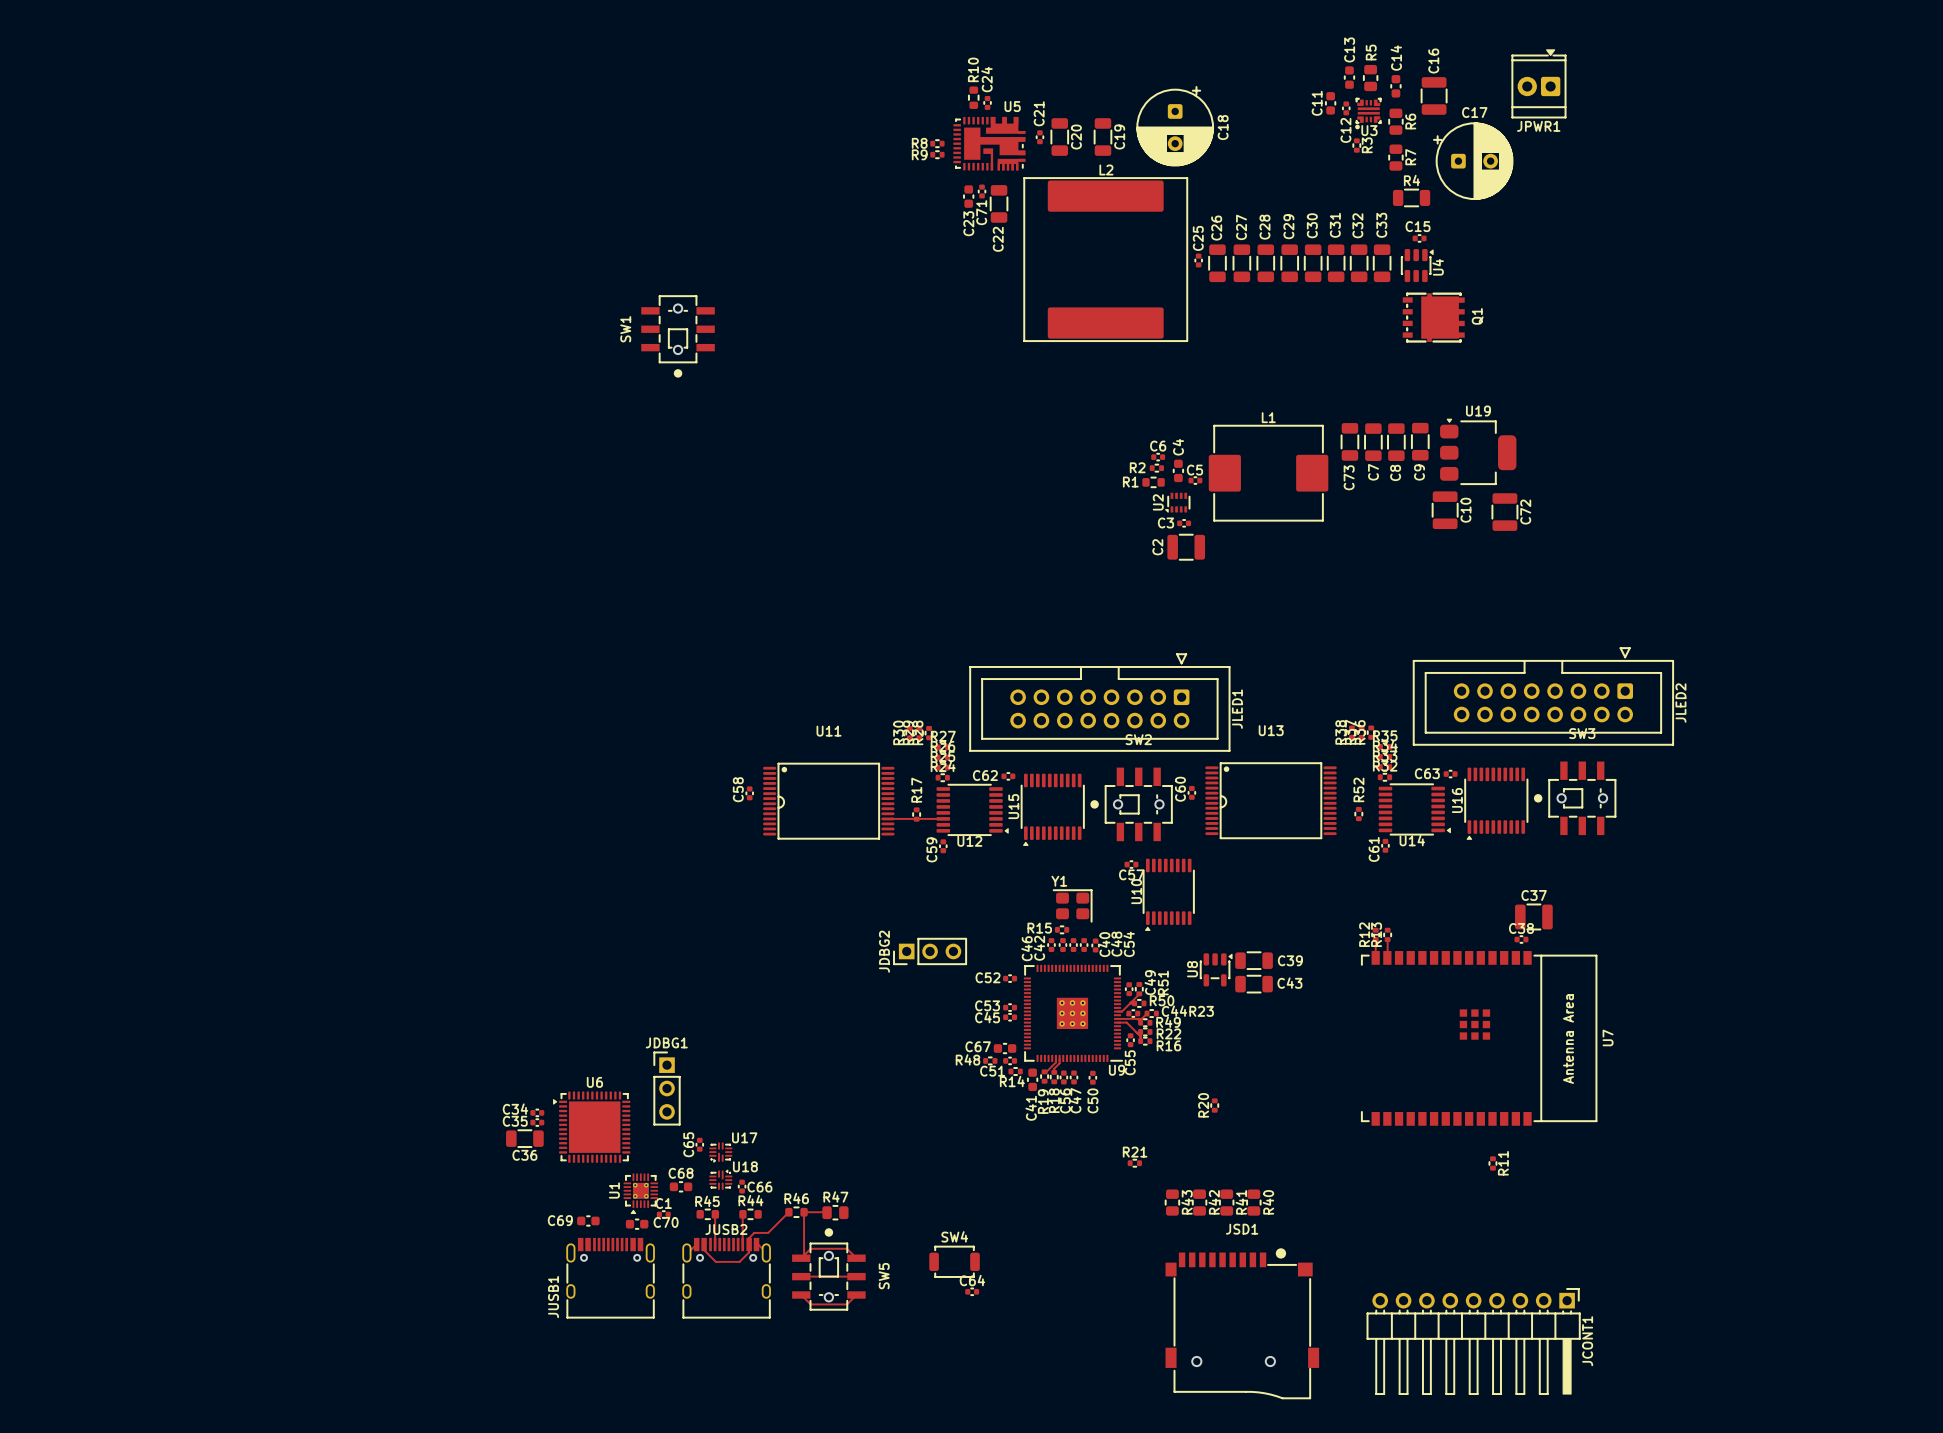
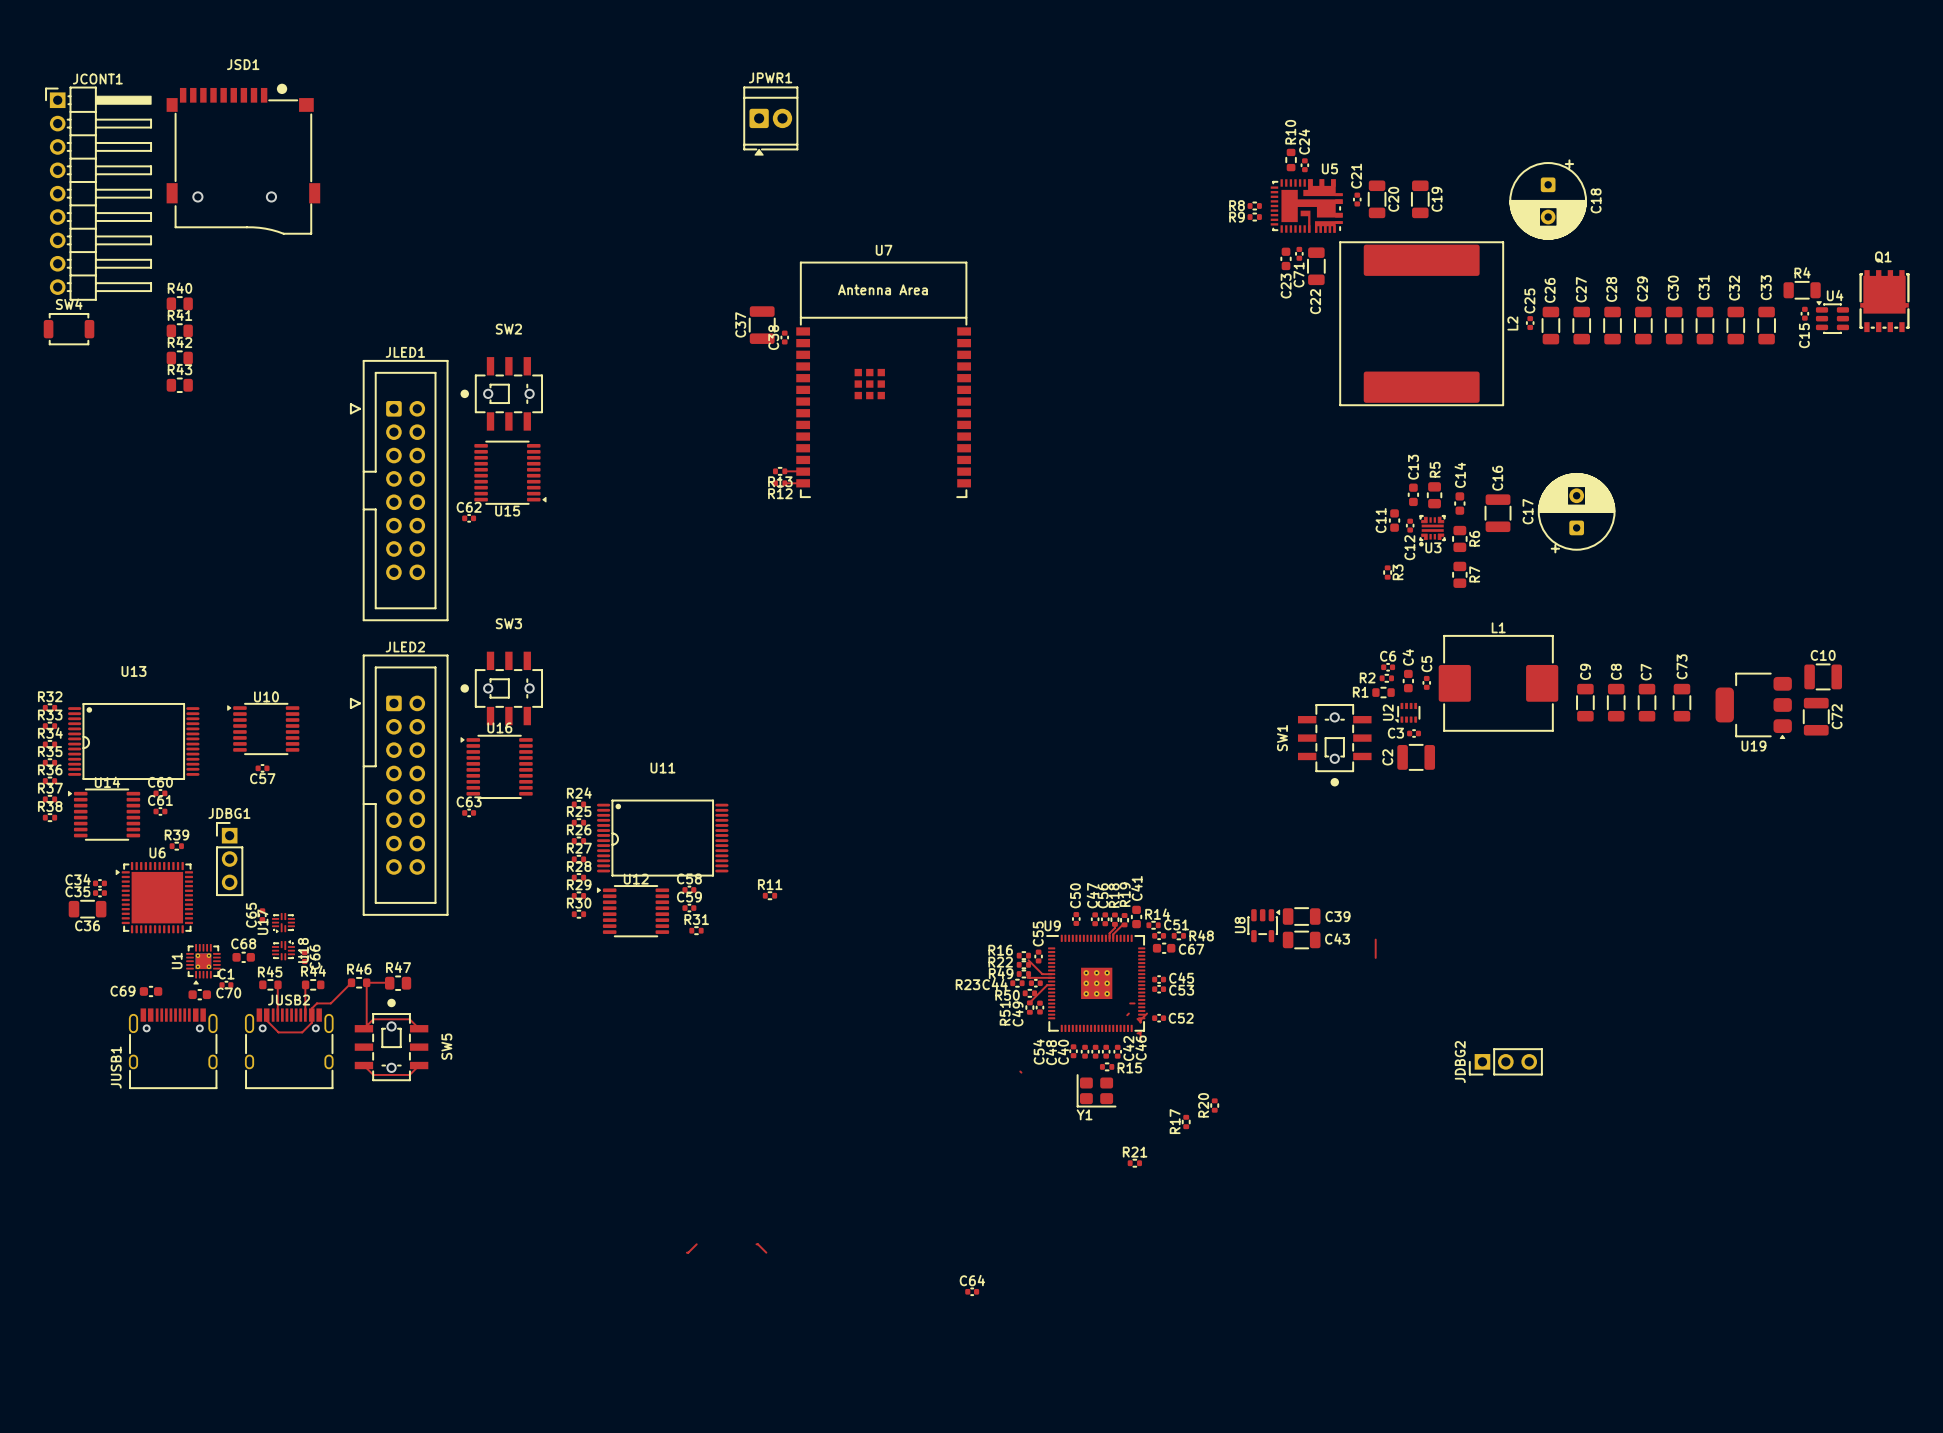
C13 position: (1349, 77) -> (1413, 494)
R5 position: (1370, 78) -> (1434, 495)
JPWR1 rotation: 0° (1538, 83) -> 180° (770, 121)
JPWR1 position: (1538, 83) -> (770, 121)
C14 position: (1395, 86) -> (1459, 503)
C16 position: (1434, 95) -> (1498, 513)
R10 position: (973, 97) -> (1291, 160)
C24 position: (987, 102) -> (1304, 165)
C11 position: (1330, 103) -> (1394, 520)
C12 position: (1346, 108) -> (1410, 525)
U3 position: (1368, 113) -> (1432, 530)
R6 position: (1395, 121) -> (1459, 538)
C18 position: (1175, 126) -> (1548, 199)
C21 position: (1039, 137) -> (1357, 199)
C20 position: (1059, 137) -> (1377, 199)
C19 position: (1102, 137) -> (1420, 199)
R8 position: (937, 143) -> (1254, 206)
U5 position: (989, 143) -> (1306, 206)
R3 position: (1356, 145) -> (1387, 572)
R9 position: (937, 154) -> (1254, 217)
R7 position: (1395, 157) -> (1459, 574)
C17 rotation: 0° (1473, 161) -> 90° counterclockwise (1576, 513)
C17 position: (1473, 161) -> (1576, 513)
L2 name rotation: 0° (1106, 170) -> 90° counterclockwise (1512, 323)
L2 name position: L2 (1106, 170) -> L2 (1512, 323)
C71 position: (982, 191) -> (1299, 253)
C23 position: (968, 196) -> (1286, 258)
R4 position: (1411, 197) -> (1802, 290)
C22 position: (999, 203) -> (1316, 266)
C15 name position: C15 (1418, 226) -> C15 (1804, 335)
C15 rotation: 0° (1419, 238) -> 90° clockwise (1804, 313)
C15 position: (1419, 238) -> (1804, 313)
L2 position: (1105, 259) -> (1421, 323)
C25 position: (1198, 260) -> (1530, 323)
C26 position: (1217, 263) -> (1550, 325)
C27 position: (1241, 263) -> (1581, 325)
C28 position: (1265, 263) -> (1612, 325)
C29 position: (1289, 263) -> (1643, 325)
C30 position: (1313, 263) -> (1674, 325)
C31 position: (1336, 263) -> (1704, 325)
C32 position: (1359, 263) -> (1735, 325)
C33 position: (1382, 263) -> (1766, 325)
U4 rotation: 0° (1417, 265) -> 90° counterclockwise (1832, 317)
U4 position: (1417, 265) -> (1832, 317)
Q1 rotation: 0° (1433, 314) -> 90° counterclockwise (1881, 301)
Q1 position: (1433, 314) -> (1881, 301)
SW1 position: (678, 336) -> (1334, 745)
C73 position: (1349, 441) -> (1681, 702)
C9 position: (1420, 441) -> (1585, 702)
C7 position: (1373, 442) -> (1647, 702)
C8 position: (1396, 442) -> (1616, 702)
U19 rotation: 0° (1478, 451) -> 180° (1753, 706)
U19 position: (1478, 451) -> (1753, 706)
C6 position: (1158, 457) -> (1388, 667)
R2 position: (1156, 468) -> (1386, 678)
C4 position: (1178, 470) -> (1408, 681)
top track: none -> (784, 471) (803, 471)
C7 name position: C7 (1373, 472) -> C7 (1646, 672)
C8 name position: C8 (1395, 472) -> C8 (1616, 671)
C9 name position: C9 (1419, 472) -> C9 (1585, 671)
L1 position: (1268, 473) -> (1498, 683)
C73 name position: C73 (1349, 477) -> C73 (1682, 666)
C5 rotation: 0° (1195, 480) -> 90° clockwise (1426, 682)
C5 position: (1195, 480) -> (1426, 682)
R1 position: (1153, 482) -> (1383, 692)
top track: none -> (784, 483) (803, 483)
U2 position: (1177, 502) -> (1407, 712)
C10 rotation: 0° (1445, 510) -> 90° clockwise (1823, 676)
C10 position: (1445, 510) -> (1823, 676)
C10 name position: C10 (1465, 510) -> C10 (1823, 655)
C72 position: (1504, 512) -> (1816, 716)
C3 position: (1184, 523) -> (1414, 733)
C2 position: (1186, 547) -> (1416, 757)
JLED2 rotation: 0° (1543, 696) -> 90° counterclockwise (399, 785)
JLED2 position: (1543, 696) -> (399, 785)
JLED1 rotation: 0° (1099, 702) -> 90° counterclockwise (399, 490)
JLED1 position: (1099, 702) -> (399, 490)
R38 rotation: 0° (1351, 732) -> 90° clockwise (49, 817)
R38 position: (1351, 732) -> (49, 817)
R37 rotation: 0° (1361, 732) -> 90° clockwise (49, 799)
R37 position: (1361, 732) -> (49, 799)
R36 rotation: 0° (1371, 732) -> 90° clockwise (49, 781)
R36 position: (1371, 732) -> (49, 781)
R30 rotation: 0° (909, 733) -> 90° clockwise (578, 914)
R30 position: (909, 733) -> (578, 914)
R29 rotation: 0° (919, 733) -> 90° clockwise (578, 895)
R29 position: (919, 733) -> (578, 895)
R28 rotation: 0° (929, 733) -> 90° clockwise (578, 877)
R28 position: (929, 733) -> (578, 877)
R35 position: (1385, 746) -> (49, 762)
R27 position: (942, 747) -> (578, 859)
R26 position: (942, 757) -> (578, 841)
R34 position: (1384, 757) -> (49, 744)
R25 position: (942, 767) -> (578, 822)
R33 position: (1384, 767) -> (49, 726)
C63 name position: C63 (1427, 773) -> C63 (469, 801)
C63 position: (1450, 774) -> (469, 812)
C62 name position: C62 (985, 775) -> C62 (469, 507)
C62 position: (1008, 776) -> (469, 518)
R24 position: (942, 777) -> (578, 804)
R32 position: (1384, 777) -> (49, 707)
R17 name position: R17 (916, 790) -> R17 (1175, 1121)
C60 rotation: 0° (1191, 792) -> 90° clockwise (160, 793)
C60 position: (1191, 792) -> (160, 793)
C58 rotation: 0° (749, 793) -> 90° clockwise (689, 889)
C58 position: (749, 793) -> (689, 889)
SW3 position: (1574, 798) -> (501, 688)
U13 position: (1270, 800) -> (133, 741)
U11 position: (828, 801) -> (662, 838)
U16 rotation: 0° (1496, 803) -> 90° clockwise (496, 766)
U16 position: (1496, 803) -> (496, 766)
SW2 position: (1131, 804) -> (501, 393)
U12 rotation: 0° (972, 809) -> 180° (633, 911)
U12 position: (972, 809) -> (633, 911)
U15 rotation: 0° (1052, 809) -> 90° counterclockwise (510, 472)
U15 position: (1052, 809) -> (510, 472)
U14 rotation: 0° (1414, 809) -> 180° (104, 814)
U14 position: (1414, 809) -> (104, 814)
R17 position: (916, 814) -> (1186, 1121)
R52: (1358, 814) -> none
top track: (887, 818) (943, 818) -> none
C61 rotation: 0° (1385, 845) -> 90° clockwise (160, 811)
C61 position: (1385, 845) -> (160, 811)
R39: none -> (176, 846)
C59 rotation: 0° (943, 846) -> 90° clockwise (689, 908)
C59 position: (943, 846) -> (689, 908)
C57 position: (1131, 864) -> (262, 768)
Y1 name position: Y1 (1059, 881) -> Y1 (1084, 1114)
U10 rotation: 0° (1168, 894) -> 90° clockwise (263, 728)
U10 position: (1168, 894) -> (263, 728)
C37 name position: C37 (1534, 895) -> C37 (740, 324)
Y1 rotation: 0° (1072, 905) -> 180° (1096, 1090)
Y1 position: (1072, 905) -> (1096, 1090)
C37 rotation: 0° (1533, 916) -> 90° clockwise (762, 325)
C37 position: (1533, 916) -> (762, 325)
top track: none -> (1114, 924) (1114, 928) (1109, 933) (1109, 938)
top track: none -> (1124, 924) (1113, 934) (1113, 938)
R15 name position: R15 (1039, 928) -> R15 (1129, 1067)
R15 position: (1062, 929) -> (1107, 1066)
R31: none -> (696, 930)
R12 rotation: 0° (1375, 934) -> 90° clockwise (780, 483)
R12 position: (1375, 934) -> (780, 483)
R13 rotation: 0° (1387, 934) -> 90° clockwise (780, 471)
R13 position: (1387, 934) -> (780, 471)
top track: (1387, 939) (1387, 957) -> none
C38 rotation: 0° (1521, 939) -> 90° clockwise (784, 337)
C38 position: (1521, 939) -> (784, 337)
C40 name position: C40 (1104, 944) -> C40 (1063, 1052)
C48 name position: C48 (1116, 944) -> C48 (1051, 1052)
C54 name position: C54 (1129, 944) -> C54 (1038, 1051)
C46 position: (1051, 945) -> (1117, 1051)
C42 position: (1062, 945) -> (1106, 1051)
C40 position: (1073, 945) -> (1095, 1051)
C48 position: (1084, 945) -> (1085, 1051)
C54 position: (1095, 945) -> (1073, 1051)
C46 name position: C46 (1026, 948) -> C46 (1141, 1048)
C42 name position: C42 (1039, 948) -> C42 (1128, 1048)
JDBG2 position: (930, 951) -> (1505, 1061)
top track: none -> (1028, 960) (1042, 974) (1051, 974)
C39 position: (1254, 960) -> (1301, 916)
U8 position: (1216, 969) -> (1263, 925)
C52 name position: C52 (988, 977) -> C52 (1181, 1018)
C52 position: (1010, 978) -> (1159, 1018)
top track: none -> (351, 982) (330, 1003) (316, 1003) (311, 1008) (311, 1022) (302, 1032) (278, 1032) (266, 1020) (266, 1014)
C49 name position: C49 (1150, 982) -> C49 (1017, 1014)
R51 name position: R51 (1163, 982) -> R51 (1005, 1013)
top track: none -> (389, 983) (366, 982) (366, 1025)
top track: none -> (277, 984) (277, 1014)
top track: none -> (305, 984) (305, 1014)
C43 position: (1254, 984) -> (1301, 939)
top track: none -> (1051, 985) (1047, 985) (1030, 1002)
C49 position: (1129, 989) -> (1039, 1007)
R51 position: (1139, 989) -> (1029, 1007)
top track: (1138, 993) (1121, 1011) (1117, 1011) -> none
R50 name position: R50 (1162, 1000) -> R50 (1007, 995)
R50 position: (1139, 1003) -> (1029, 993)
C53 name position: C53 (987, 1005) -> C53 (1181, 990)
C53 position: (1010, 1007) -> (1159, 989)
C44 name position: C44 (1174, 1011) -> C44 (995, 984)
R23 name position: R23 (1201, 1011) -> R23 (967, 984)
U9 rotation: 0° (1073, 1013) -> 180° (1095, 983)
C44 position: (1133, 1013) -> (1035, 983)
R23 position: (1151, 1013) -> (1017, 983)
C45 name position: C45 (987, 1017) -> C45 (1181, 978)
C45 position: (1010, 1017) -> (1159, 979)
top track: (1117, 1018) (1141, 1018) -> (1027, 977) (1051, 977)
top track: (1117, 1022) (1126, 1022) (1140, 1036) -> none
R49 position: (1145, 1022) -> (1023, 974)
R49 name position: R49 (1168, 1022) -> R49 (1001, 973)
top track: none -> (363, 1028) (373, 1019) (409, 1019) (419, 1028)
R22 position: (1145, 1031) -> (1023, 964)
R22 name position: R22 (1168, 1033) -> R22 (1000, 962)
U7 rotation: 0° (1479, 1038) -> 90° counterclockwise (883, 379)
U7 position: (1479, 1038) -> (883, 379)
C55 position: (1130, 1040) -> (1038, 956)
R16 position: (1145, 1041) -> (1023, 955)
R16 name position: R16 (1168, 1045) -> R16 (1000, 950)
C67 name position: C67 (978, 1046) -> C67 (1191, 949)
C67 position: (1005, 1048) -> (1164, 948)
top track: (1055, 1058) (1055, 1062) (1044, 1071) -> none
top track: (1059, 1058) (1059, 1063) (1054, 1068) (1054, 1072) -> none
R48 name position: R48 (967, 1059) -> R48 (1201, 935)
R48 position: (990, 1060) -> (1178, 935)
C51 position: (1010, 1060) -> (1159, 935)
C55 name position: C55 (1130, 1062) -> C55 (1038, 933)
top track: none -> (363, 1065) (373, 1074) (409, 1074) (419, 1065)
C51 name position: C51 (992, 1071) -> C51 (1176, 924)
R14 position: (1015, 1071) -> (1153, 925)
R19 position: (1044, 1076) -> (1124, 920)
R18 position: (1054, 1077) -> (1114, 919)
C56 position: (1063, 1077) -> (1105, 919)
C47 position: (1074, 1077) -> (1095, 919)
C50 position: (1092, 1077) -> (1076, 919)
C41 position: (1032, 1079) -> (1136, 916)
R14 name position: R14 (1012, 1081) -> R14 (1157, 914)
JDBG1 position: (667, 1088) -> (229, 859)
R18 name position: R18 (1054, 1100) -> R18 (1114, 895)
C56 name position: C56 (1065, 1100) -> C56 (1103, 895)
C47 name position: C47 (1075, 1100) -> C47 (1092, 895)
C50 name position: C50 (1092, 1100) -> C50 (1075, 895)
R19 name position: R19 (1043, 1101) -> R19 (1125, 894)
C41 name position: C41 (1031, 1108) -> C41 (1136, 888)
C34 position: (537, 1112) -> (99, 883)
C35 position: (537, 1122) -> (99, 893)
U6 position: (591, 1127) -> (154, 897)
U17 name rotation: 0° (744, 1137) -> 90° counterclockwise (262, 922)
U17 name position: U17 (744, 1137) -> U17 (262, 922)
C36 position: (524, 1138) -> (87, 909)
C65 position: (699, 1144) -> (262, 915)
U17 position: (720, 1152) -> (283, 923)
R11 rotation: 0° (1492, 1163) -> 90° clockwise (769, 895)
R11 position: (1492, 1163) -> (769, 895)
U18 name rotation: 0° (745, 1166) -> 90° counterclockwise (303, 950)
U18 position: (720, 1179) -> (283, 950)
C68 position: (681, 1186) -> (243, 957)
C66 position: (742, 1186) -> (304, 957)
C66 name rotation: 0° (759, 1187) -> 90° counterclockwise (315, 957)
U1 position: (640, 1193) -> (203, 964)
R43 rotation: 0° (1172, 1202) -> 90° clockwise (179, 385)
R43 position: (1172, 1202) -> (179, 385)
R43 name position: R43 (1187, 1202) -> R43 (179, 369)
R42 rotation: 0° (1199, 1202) -> 90° clockwise (179, 358)
R42 position: (1199, 1202) -> (179, 358)
R42 name position: R42 (1214, 1202) -> R42 (179, 342)
R41 rotation: 0° (1226, 1202) -> 90° clockwise (179, 330)
R41 position: (1226, 1202) -> (179, 330)
R41 name position: R41 (1241, 1202) -> R41 (179, 315)
R40 rotation: 0° (1253, 1202) -> 90° clockwise (179, 303)
R40 position: (1253, 1202) -> (179, 303)
R40 name position: R40 (1268, 1202) -> R40 (179, 288)
top track: (788, 1212) (768, 1232) (754, 1232) (749, 1238) (749, 1252) (739, 1261) (715, 1261) (704, 1250) (704, 1244) -> none
R46 position: (796, 1212) -> (359, 982)
top track: (827, 1212) (804, 1212) (804, 1255) -> none
R47 position: (835, 1212) -> (398, 983)
C1 position: (663, 1214) -> (226, 985)
R45 position: (707, 1214) -> (270, 984)
top track: (715, 1214) (715, 1244) -> none
top track: (742, 1214) (742, 1244) -> none
R44 position: (750, 1214) -> (313, 984)
C69 position: (588, 1220) -> (151, 991)
C70 position: (637, 1224) -> (199, 994)
top track: (801, 1258) (810, 1248) (847, 1248) (856, 1258) -> none
SW4 position: (954, 1261) -> (69, 329)
SW5 position: (828, 1269) -> (391, 1039)
top track: (801, 1276) (856, 1276) -> none
JUSB1 position: (610, 1278) -> (173, 1048)
JUSB2 position: (726, 1278) -> (289, 1048)
top track: (801, 1295) (810, 1304) (847, 1304) (856, 1295) -> none
JSD1 position: (1242, 1323) -> (243, 159)
JCONT1 rotation: 0° (1473, 1341) -> 90° counterclockwise (98, 193)
JCONT1 position: (1473, 1341) -> (98, 193)

